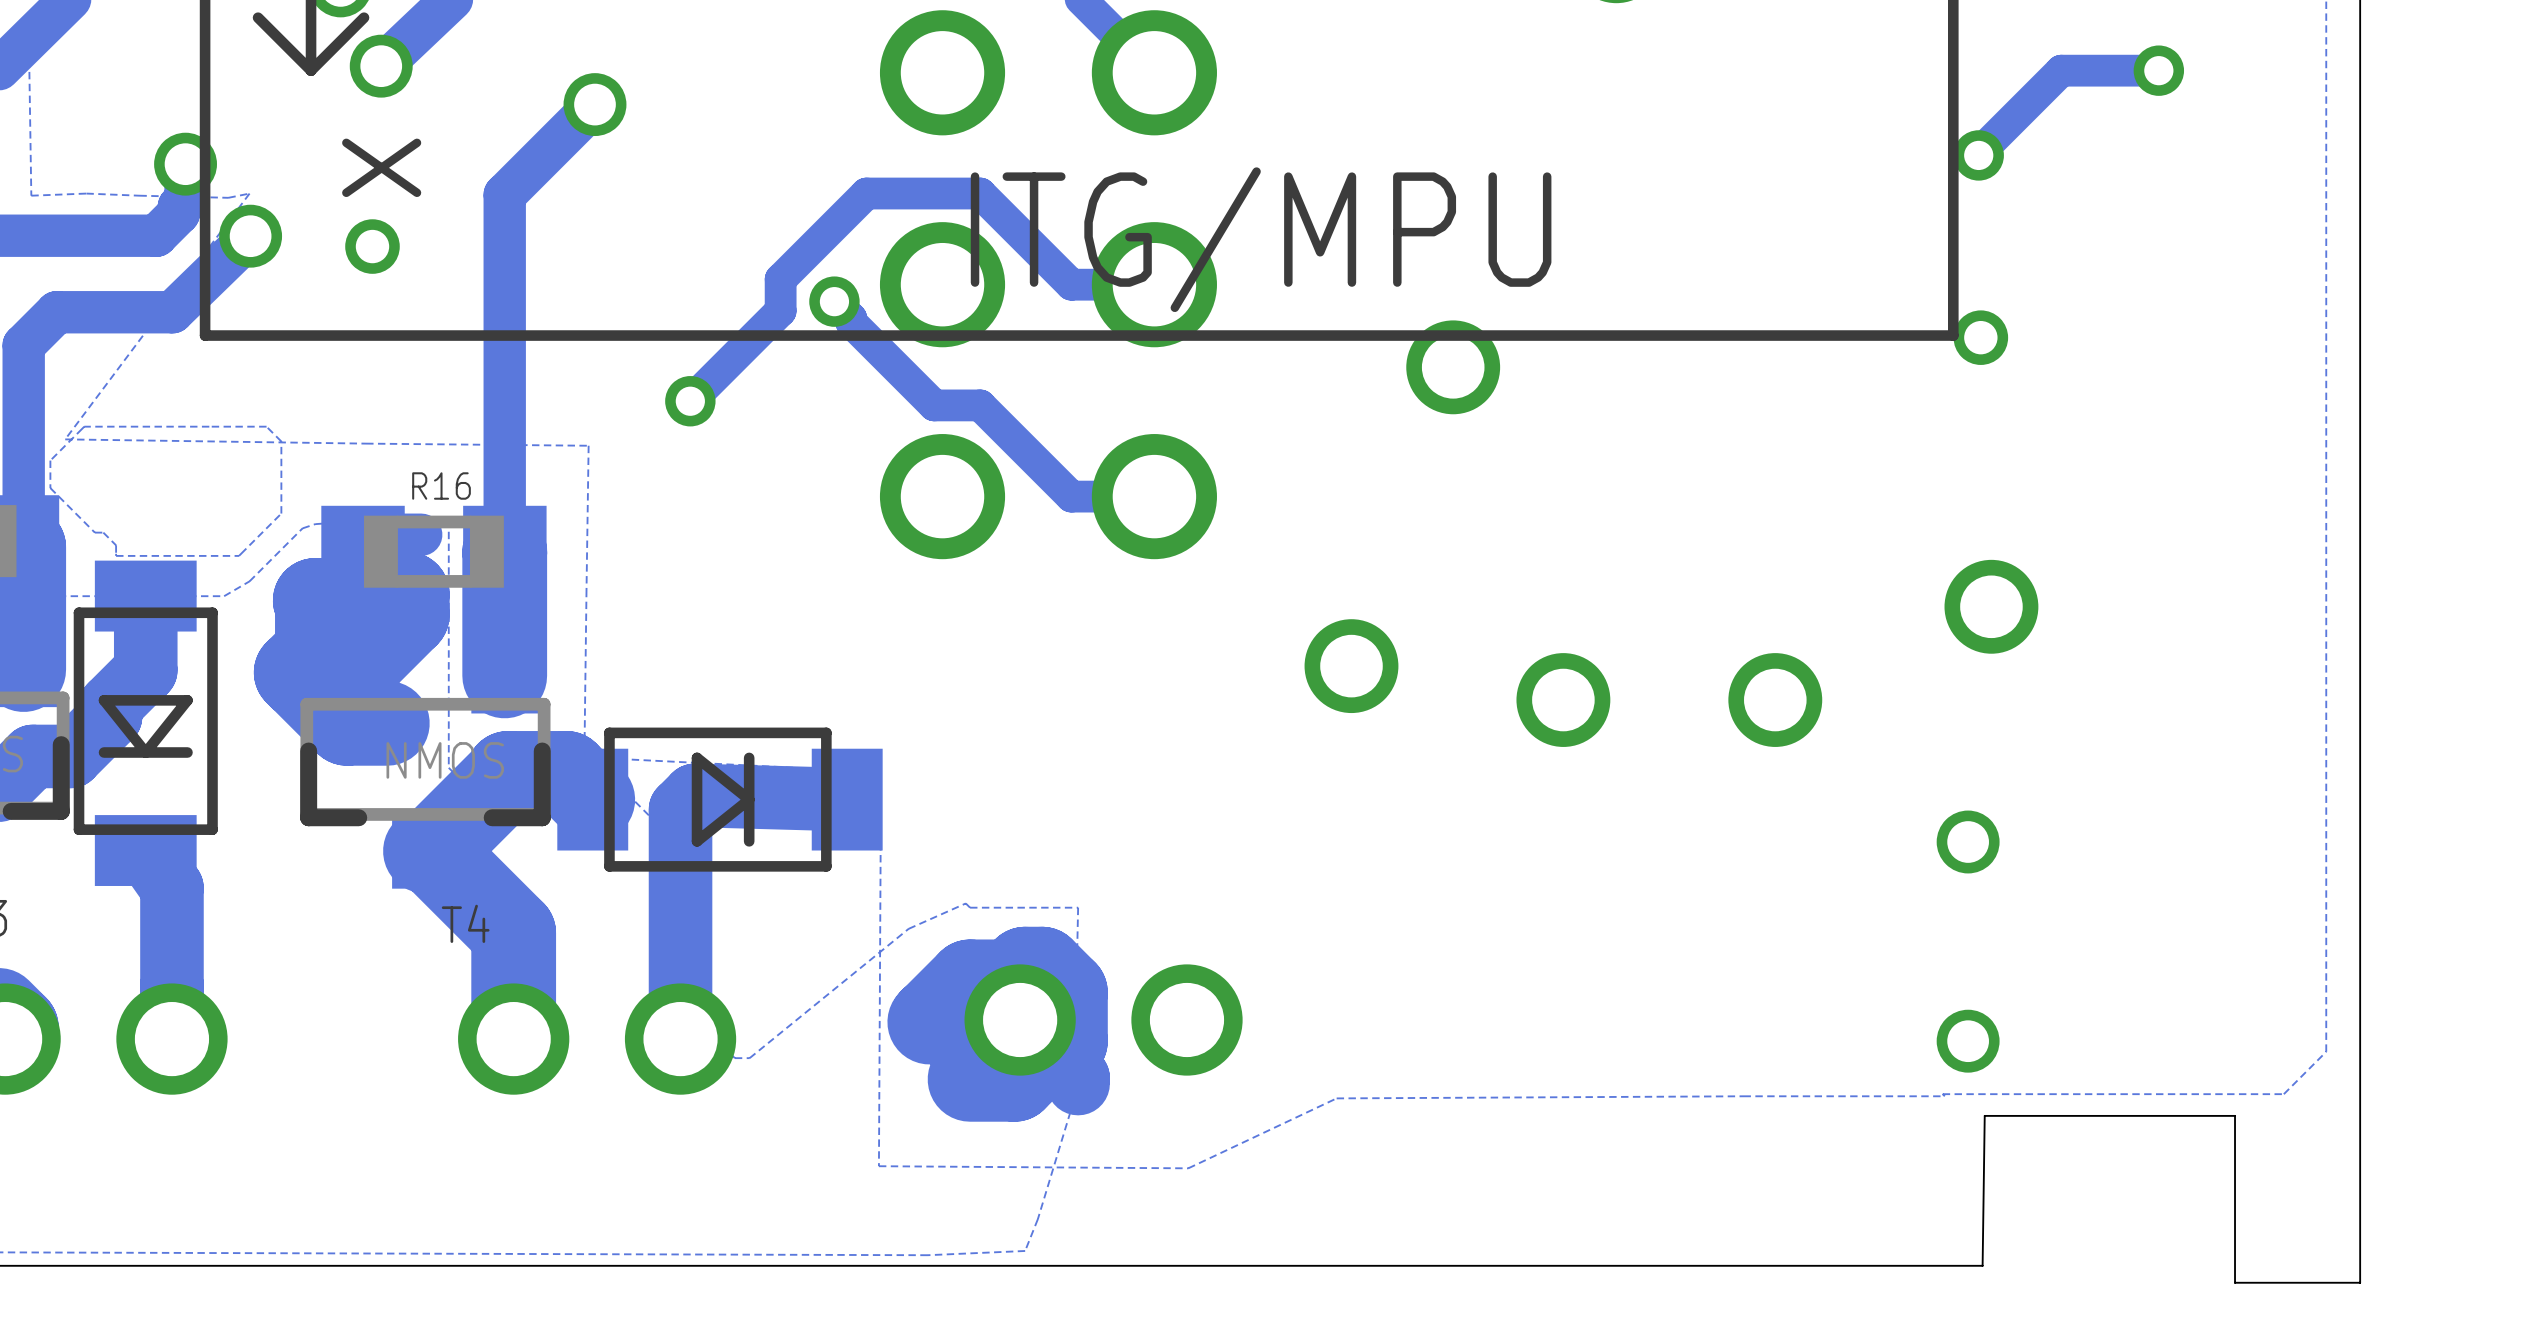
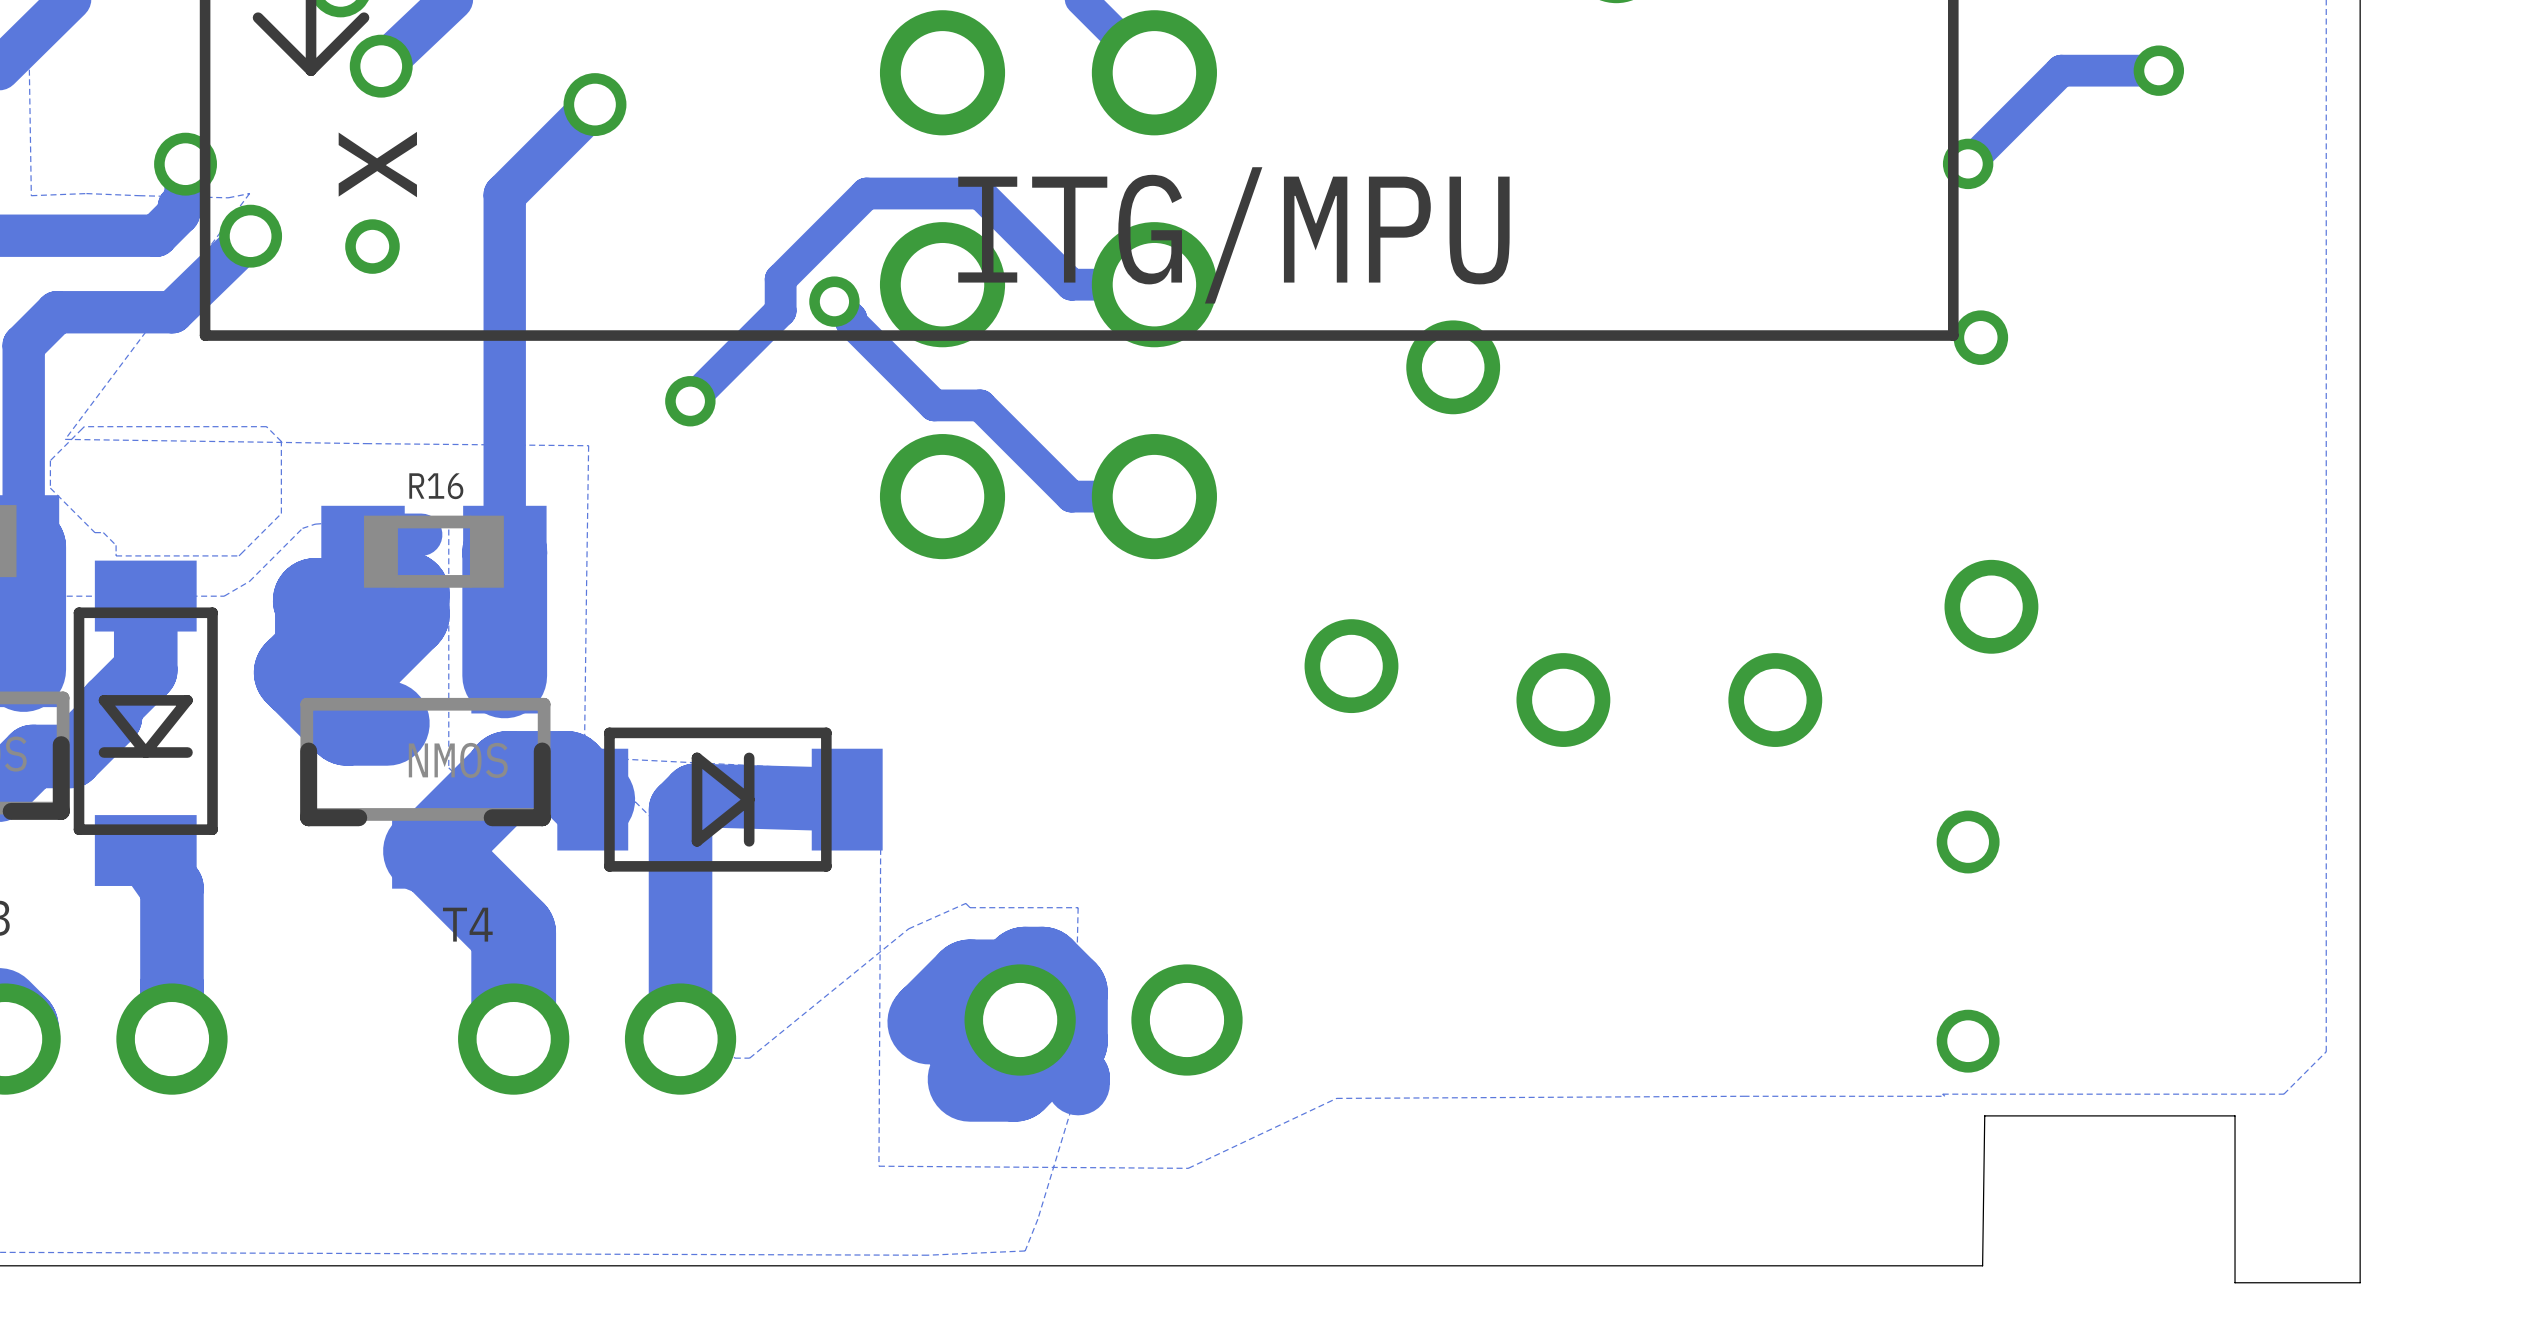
via position: (1978, 155) -> (1968, 163)

